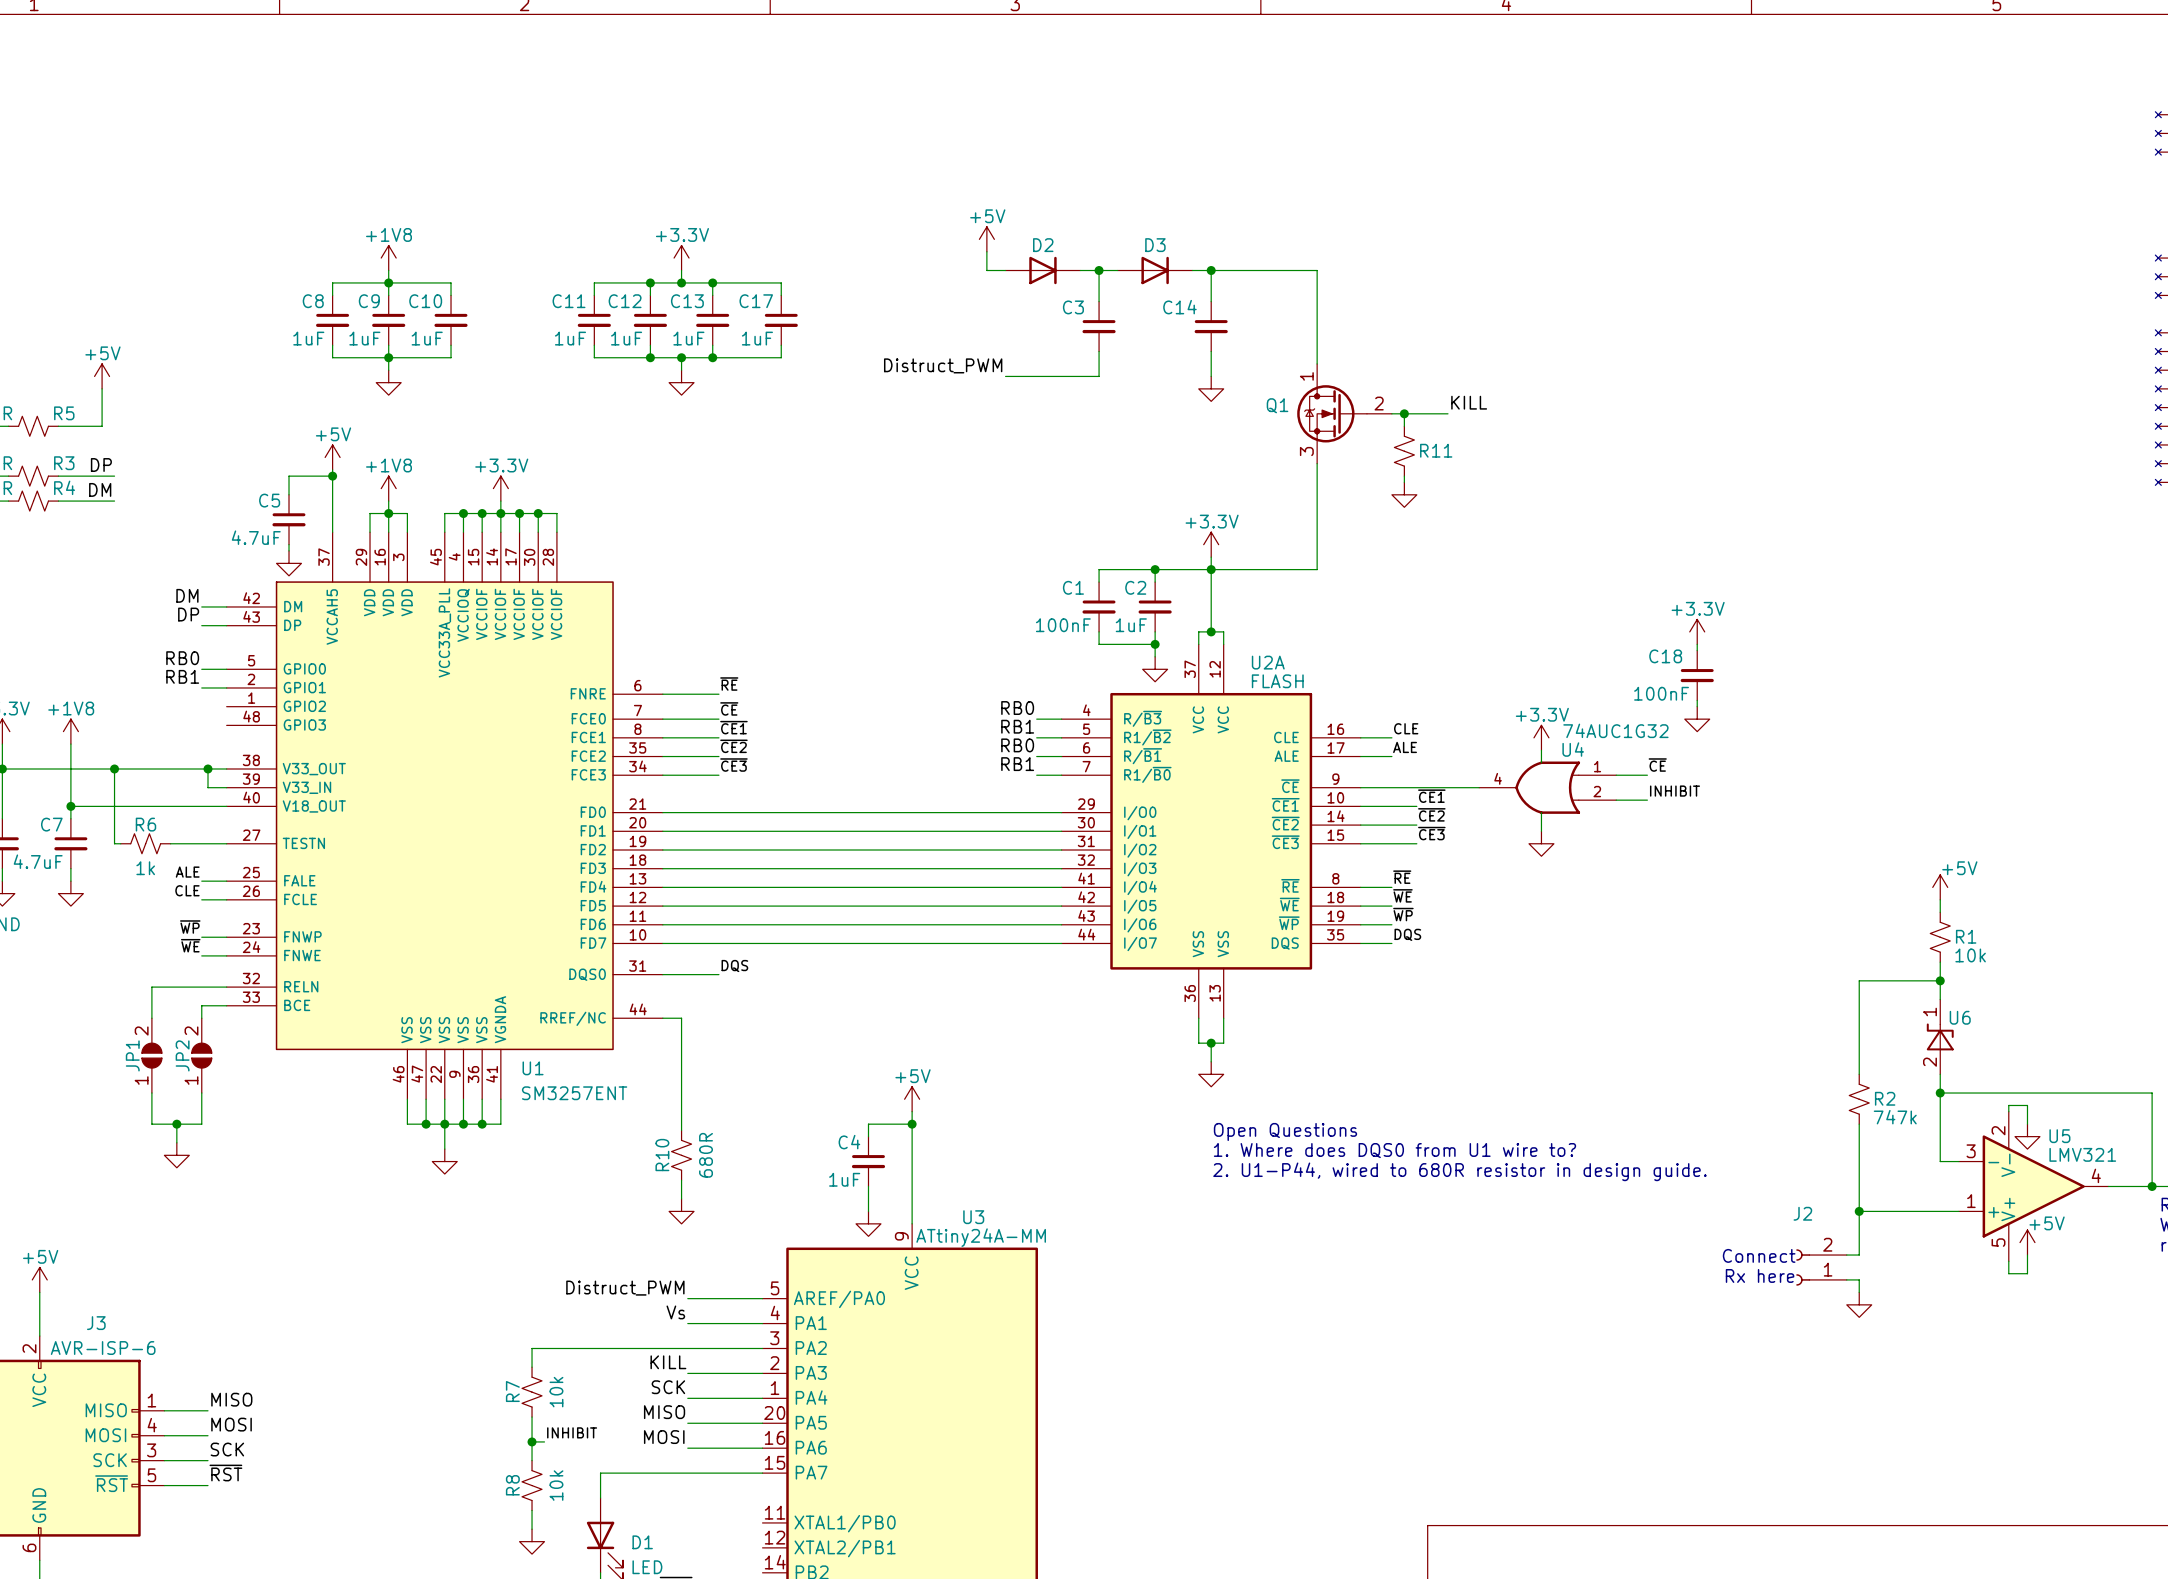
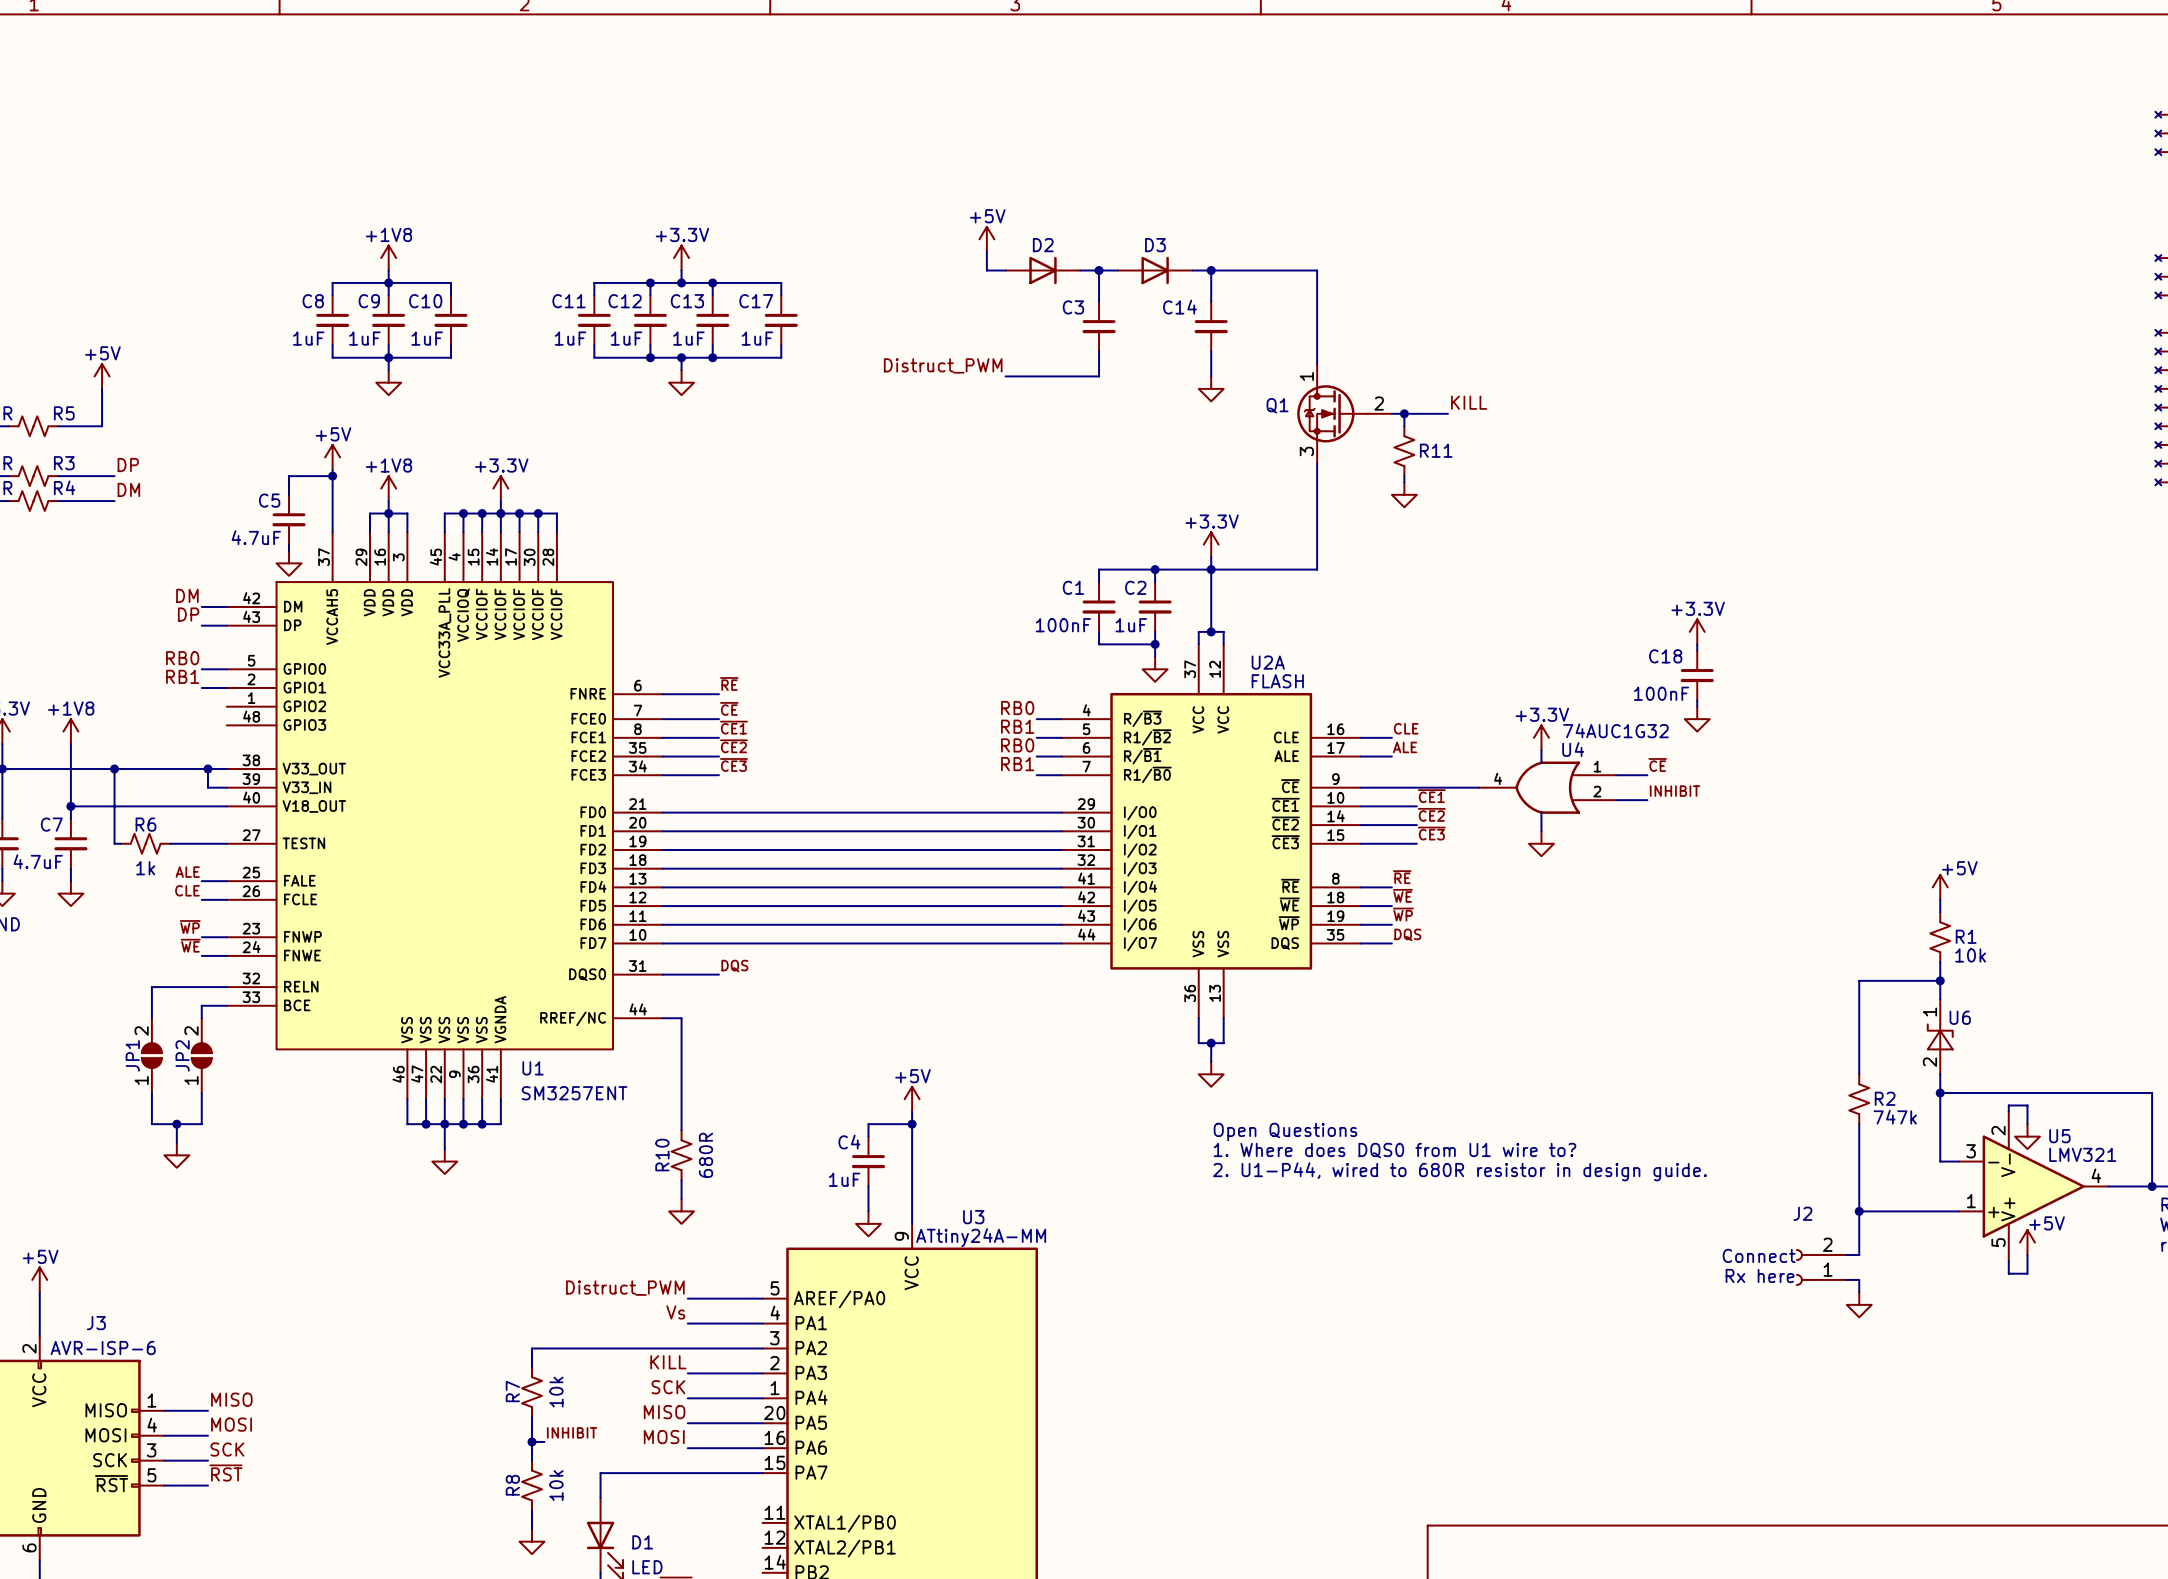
label position: DP (101, 465) -> DP (128, 465)
label position: DM (100, 489) -> DM (128, 489)

